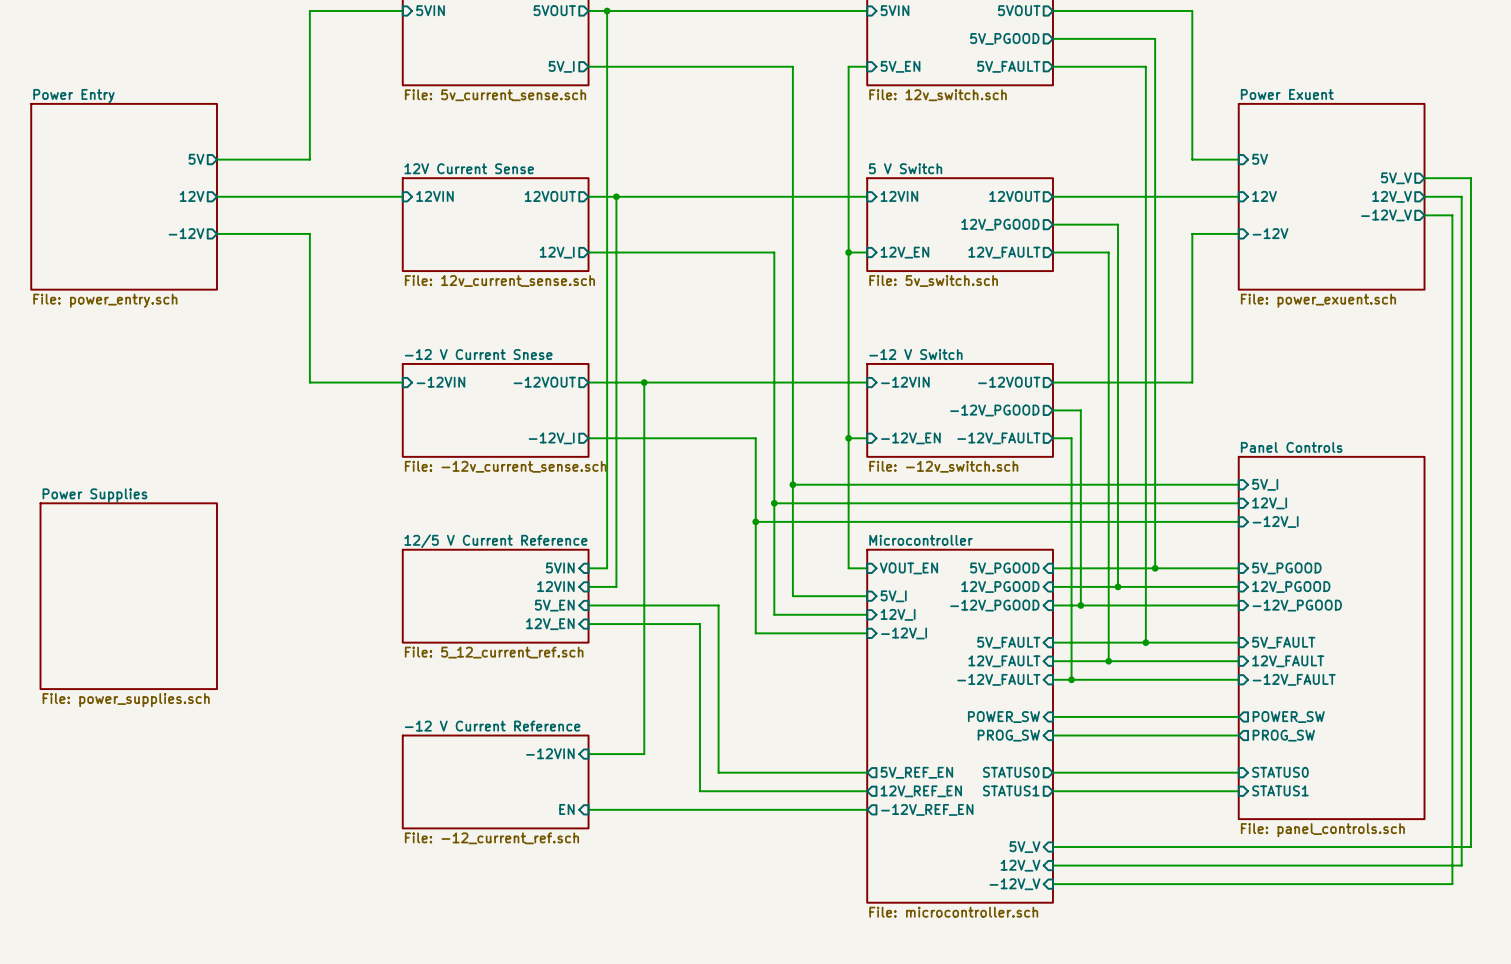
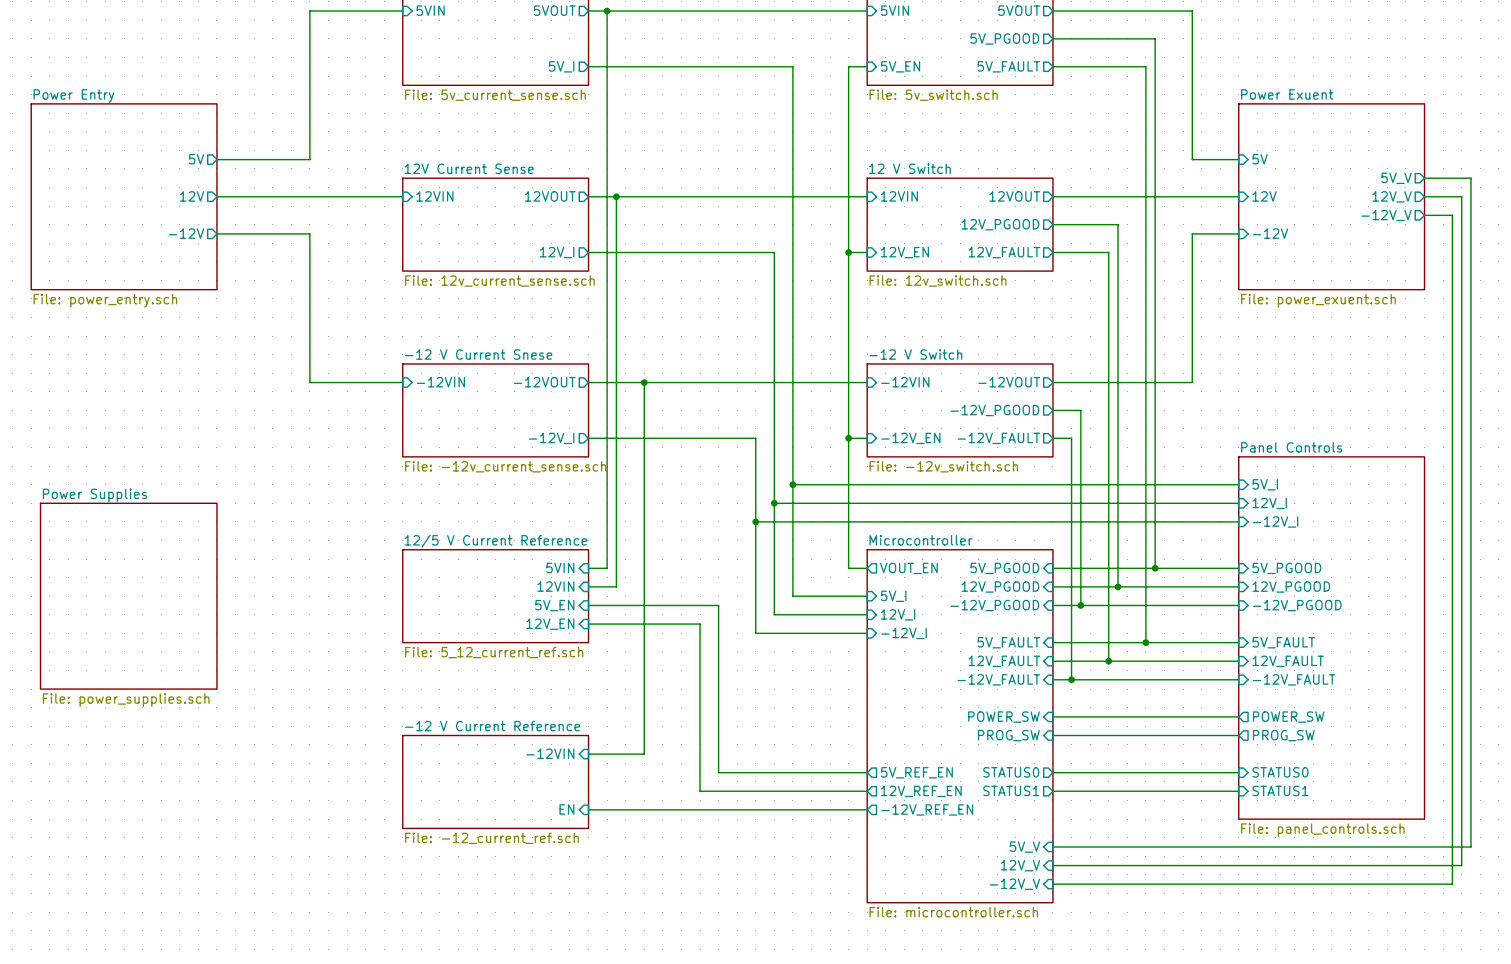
sheet value: File: 12v_switch.sch (938, 95) -> File: 5v_switch.sch (933, 95)
sheet 5 V Switch name: 5 V Switch (905, 168) -> 12 V Switch (909, 168)
sheet 5 V Switch value: File: 5v_switch.sch (933, 281) -> File: 12v_switch.sch (938, 281)
sheet pin shape: input (908, 568) -> output (908, 568)

